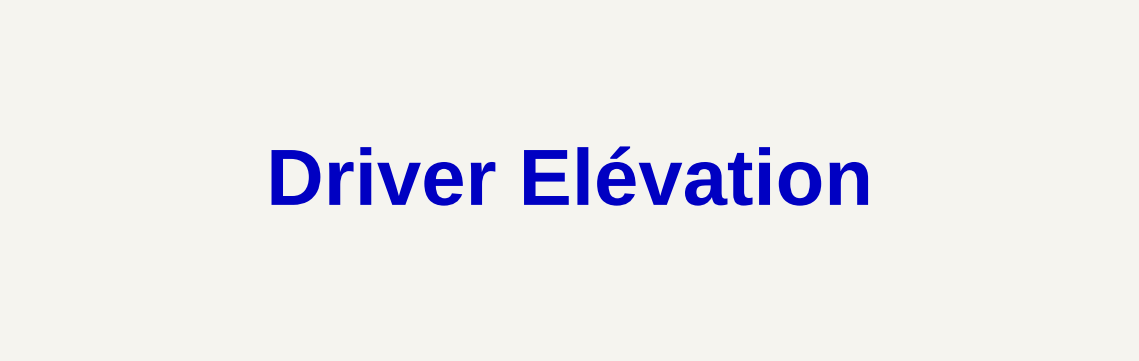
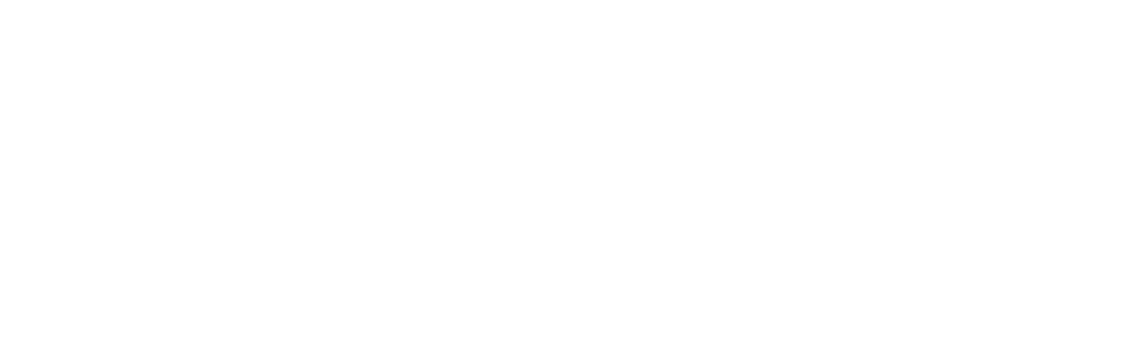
text: Driver Elévation (569, 176) -> none

